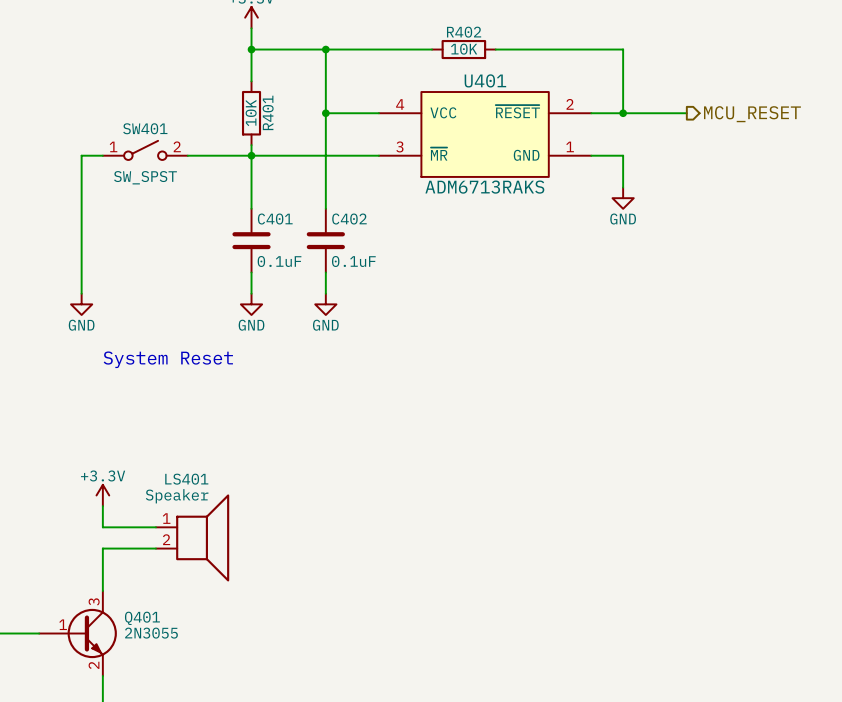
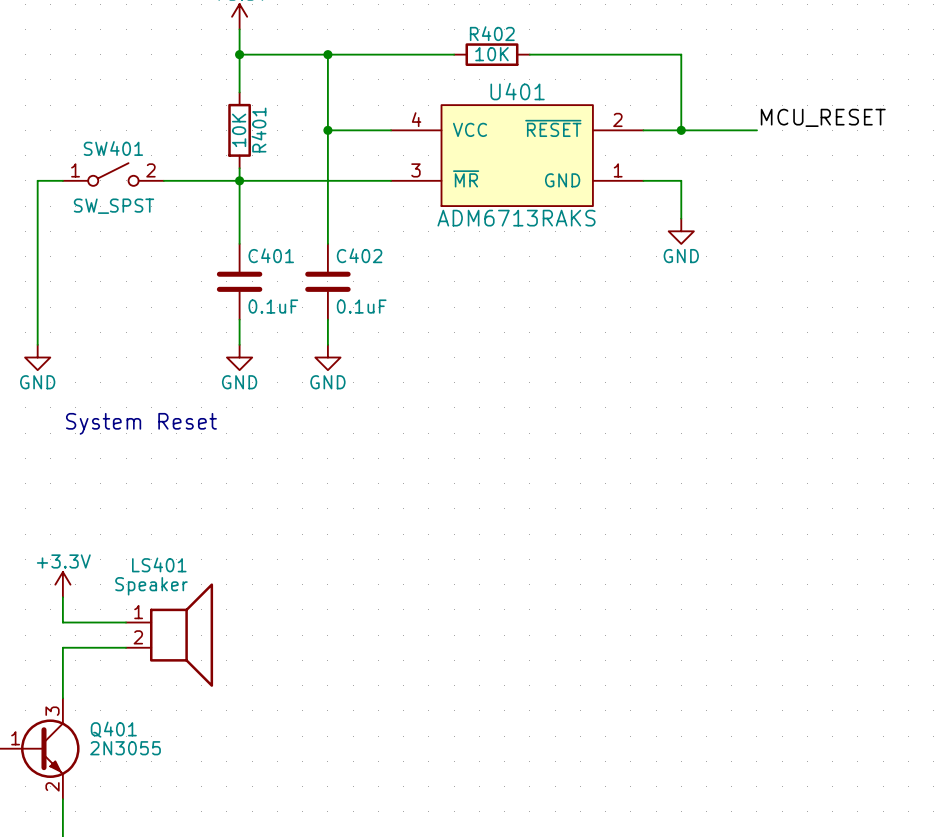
label: none -> MCU_RESET (823, 117)
hierarchical label: MCU_RESET (752, 114) -> none

